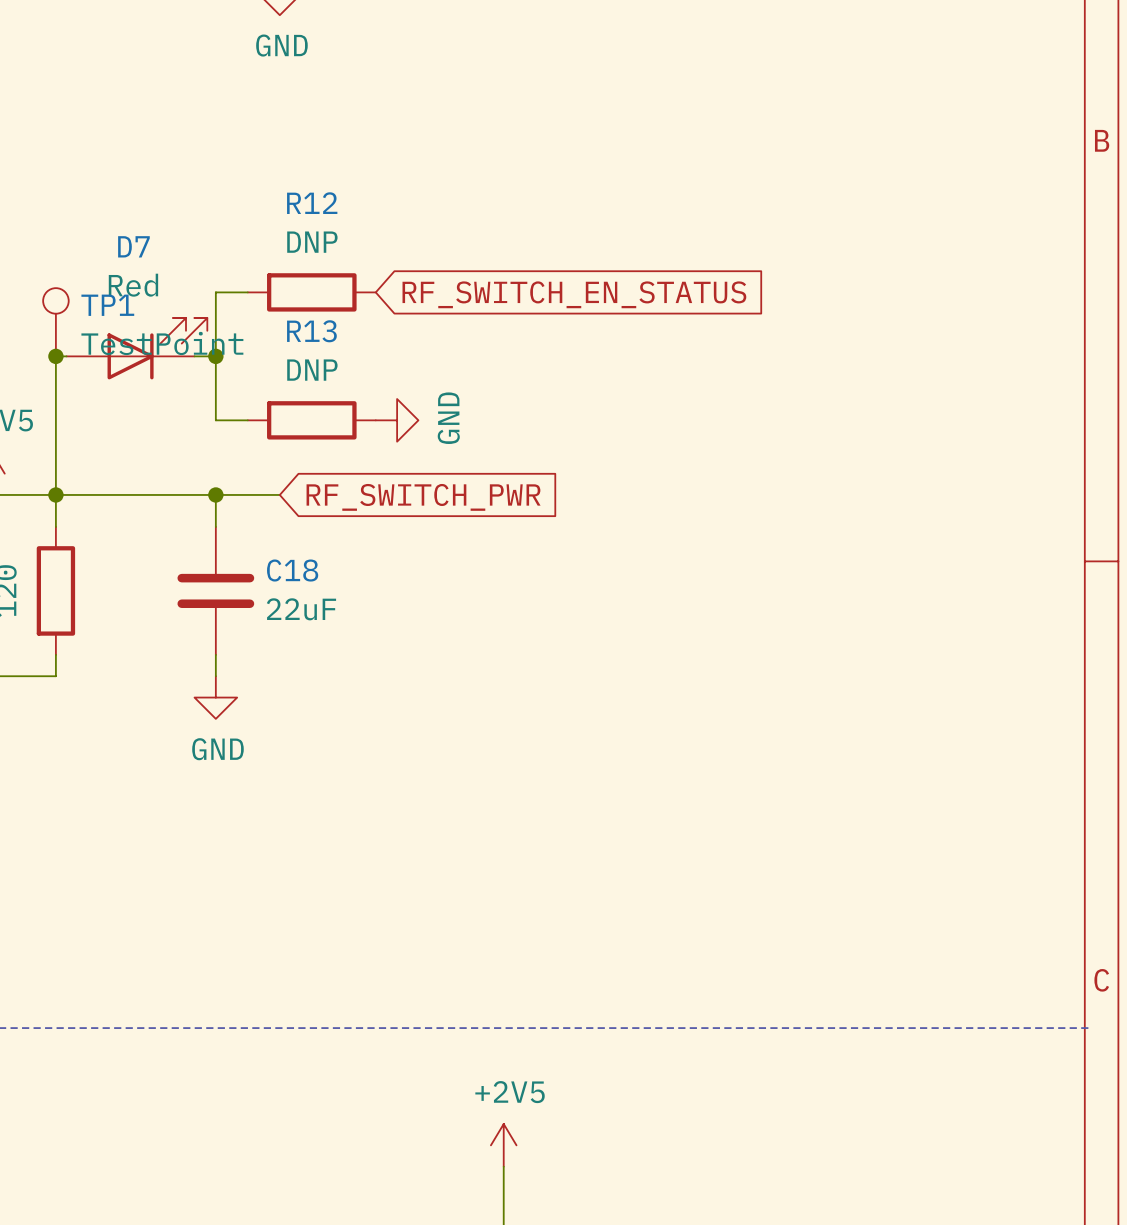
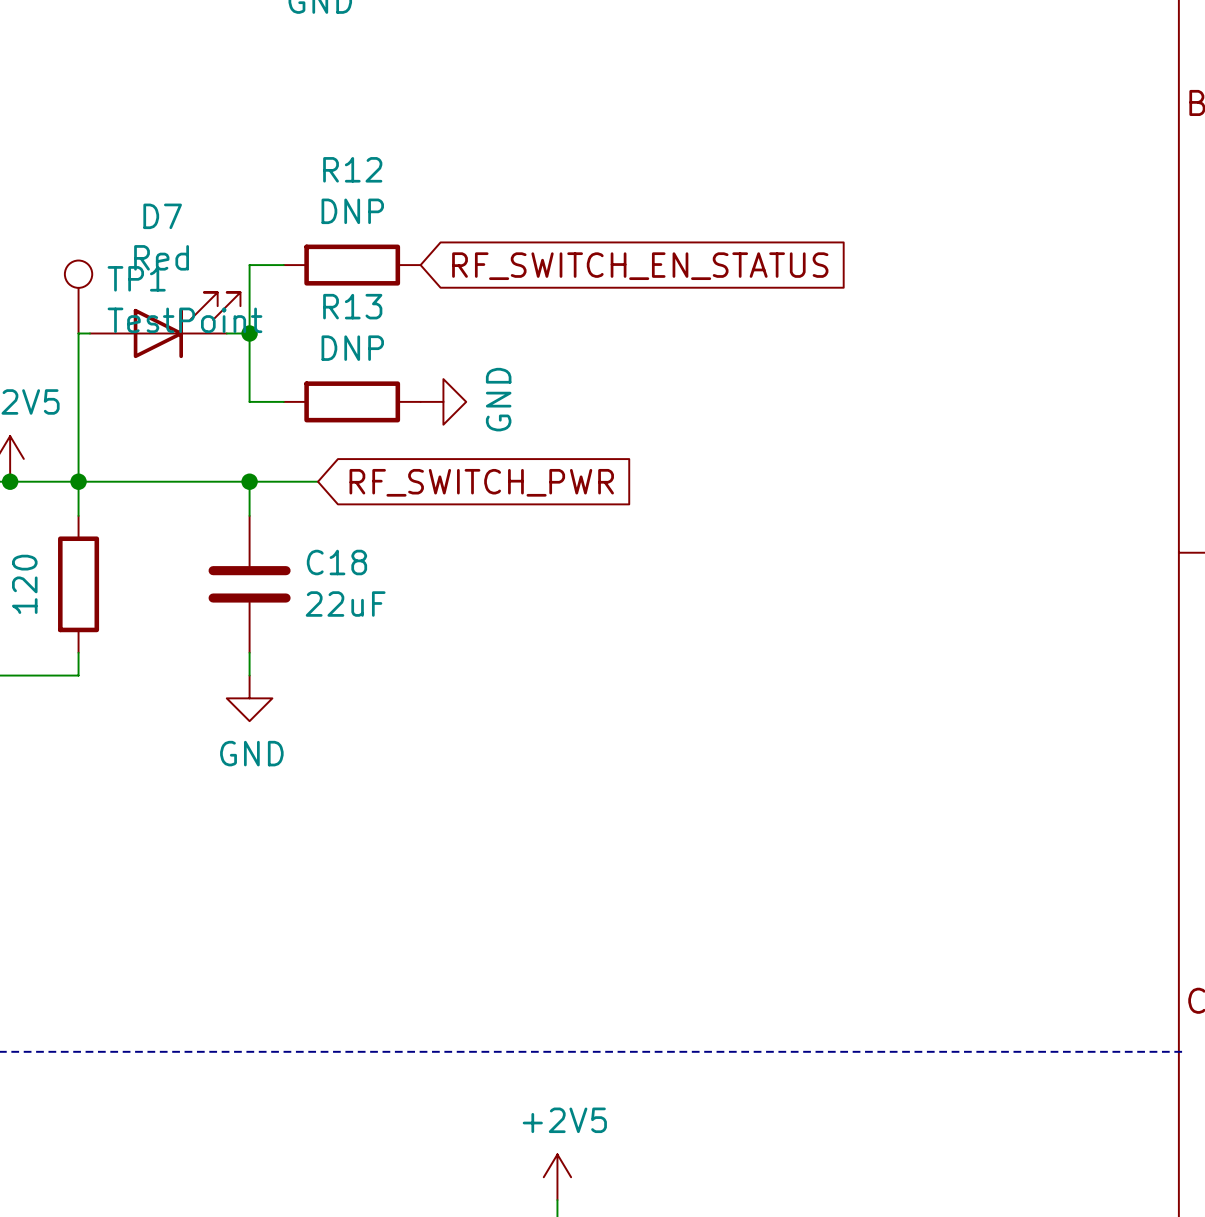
junction: (55, 356) -> none

